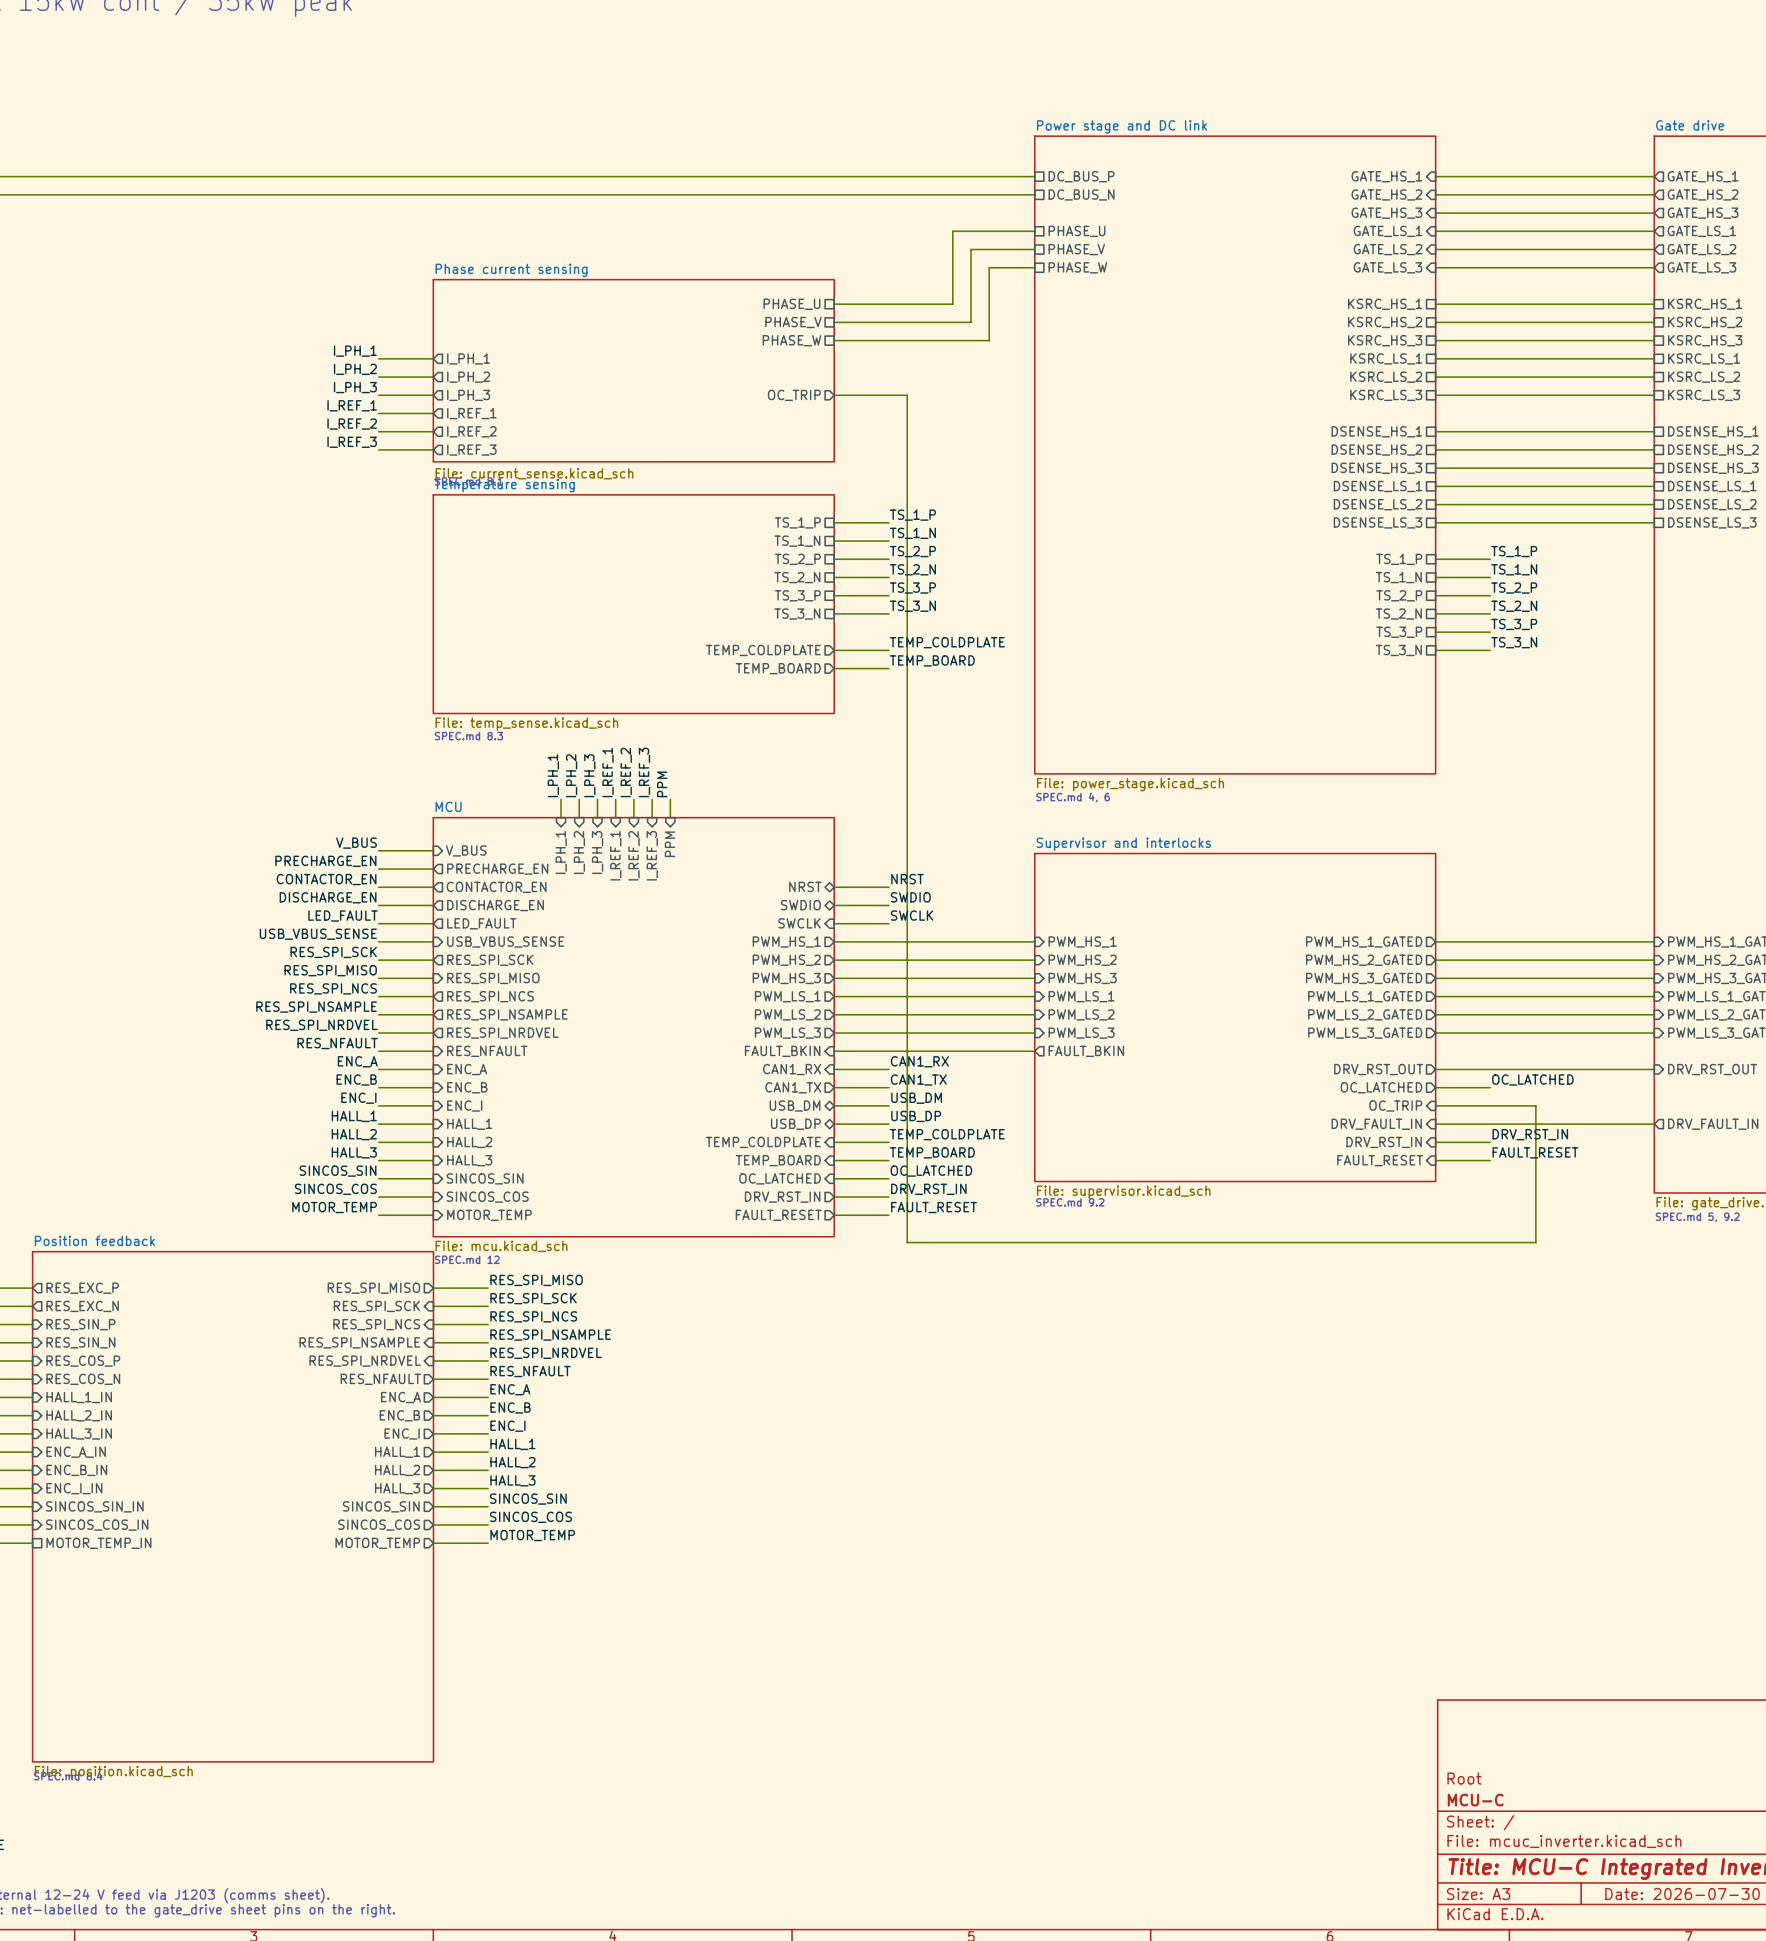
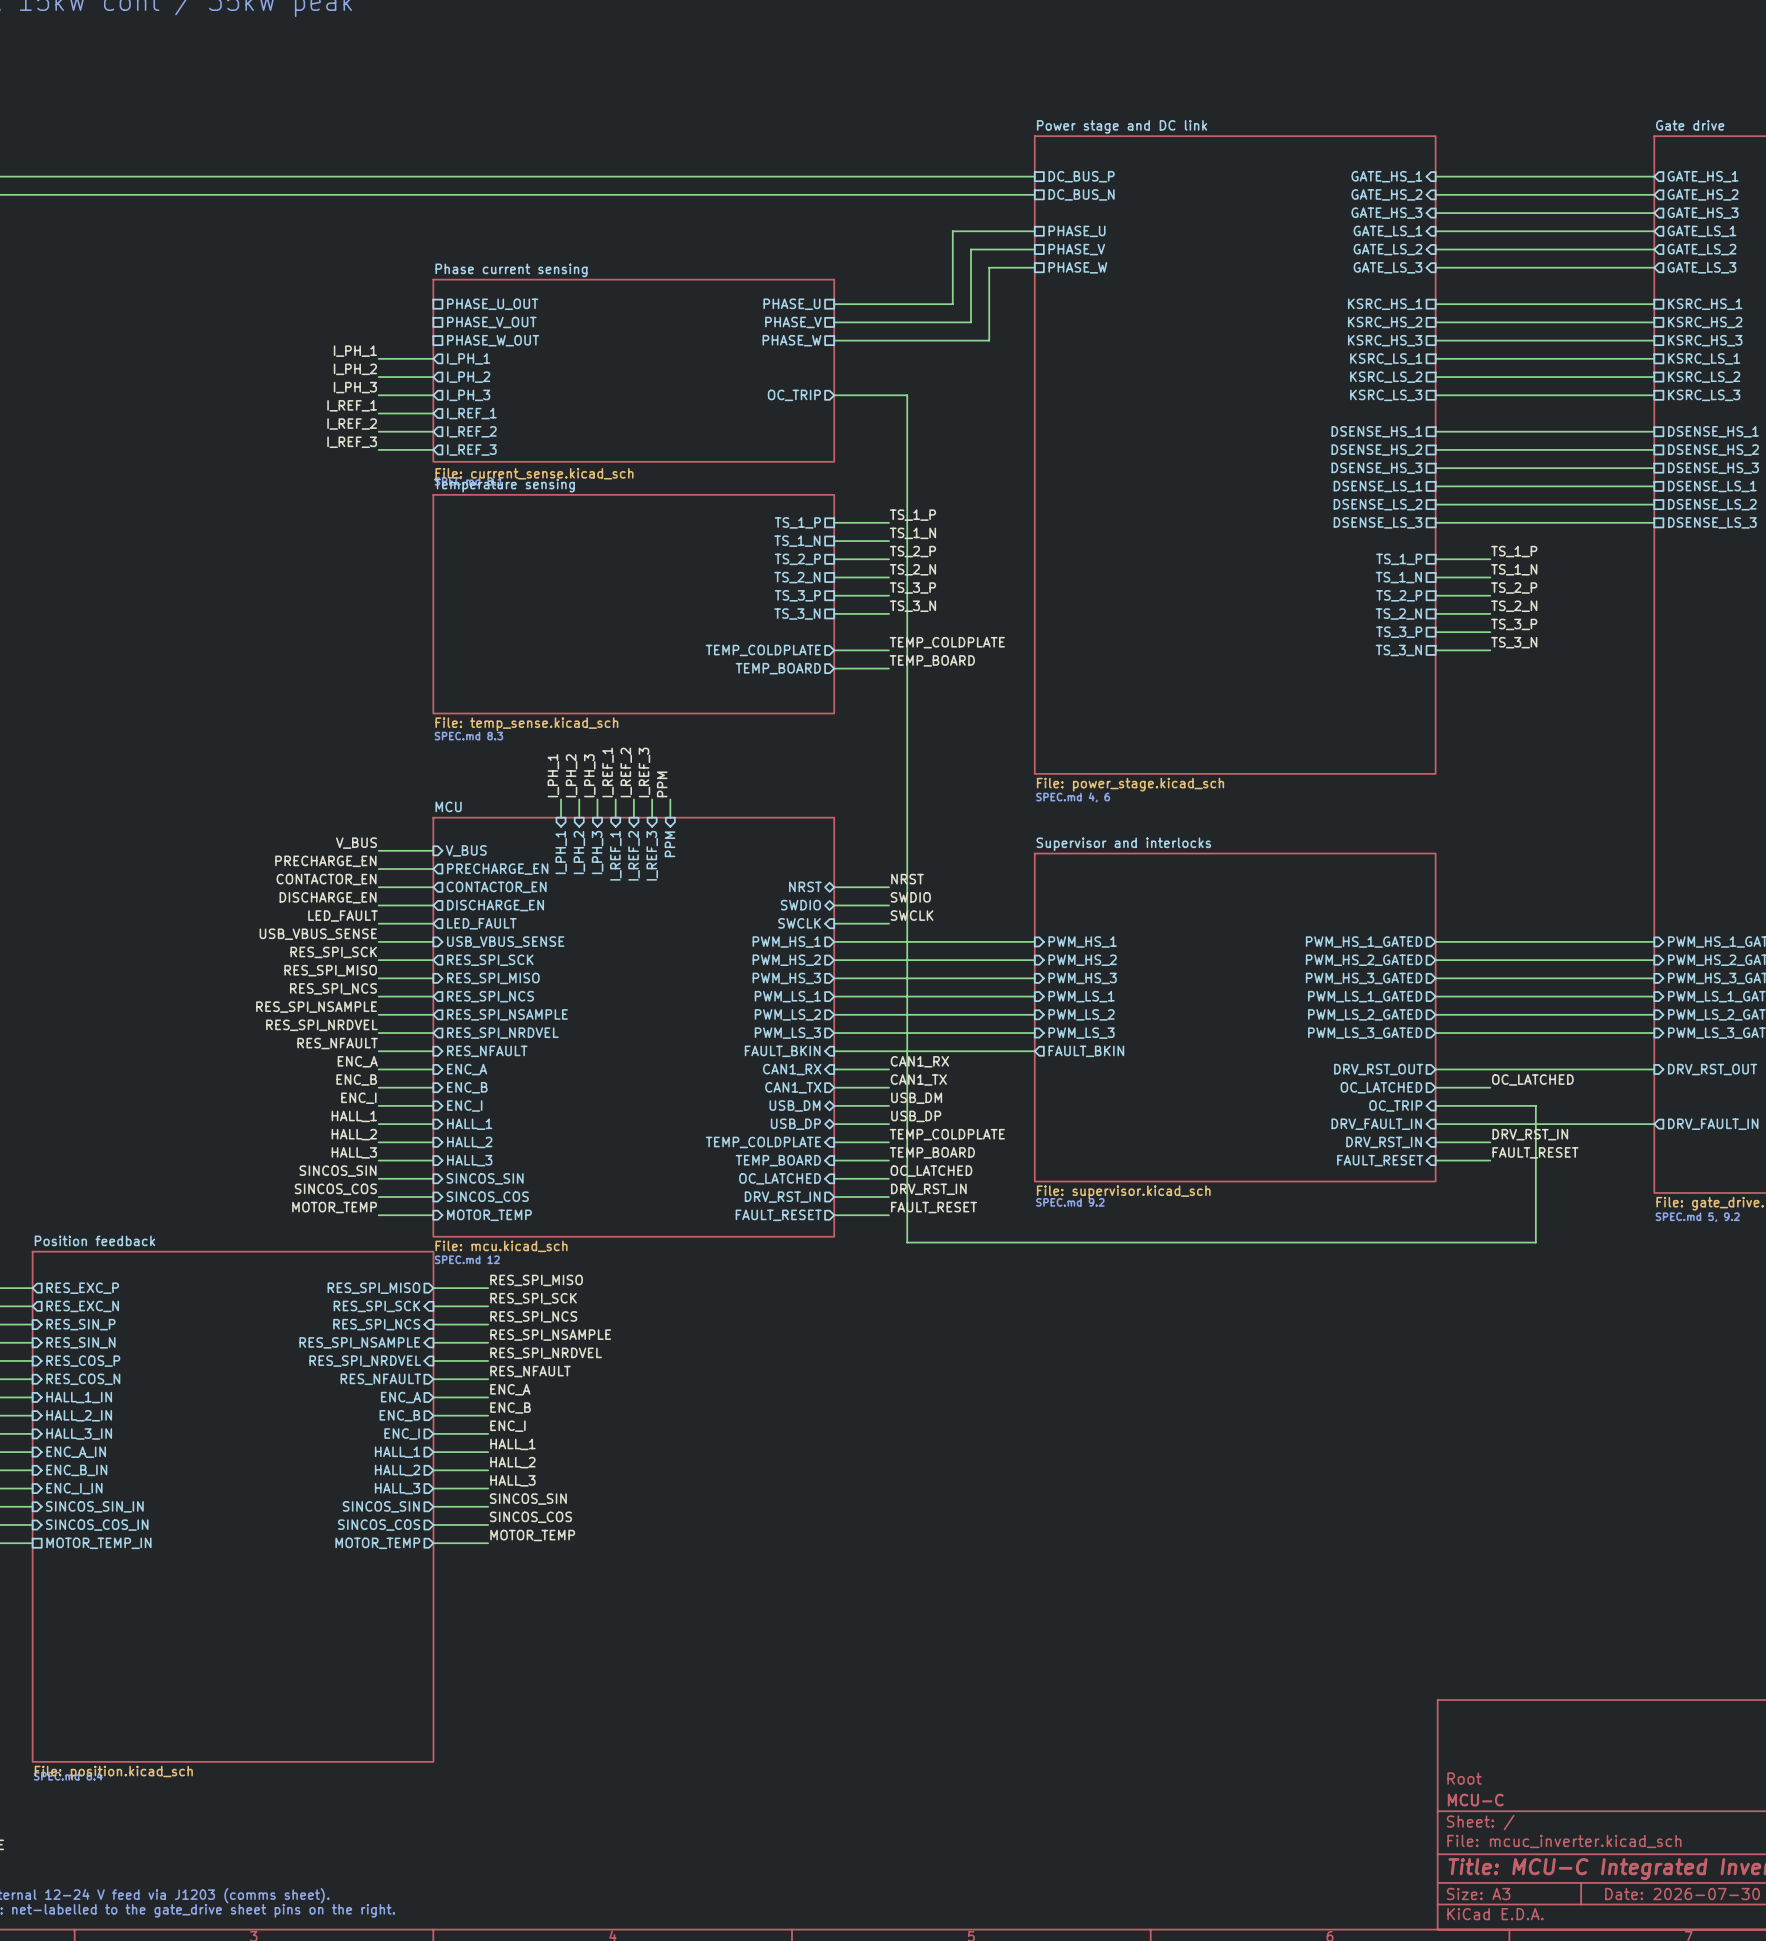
sheet pin: none -> PHASE_U_OUT (492, 304)
sheet pin: none -> PHASE_V_OUT (491, 322)
sheet pin: none -> PHASE_W_OUT (493, 340)

